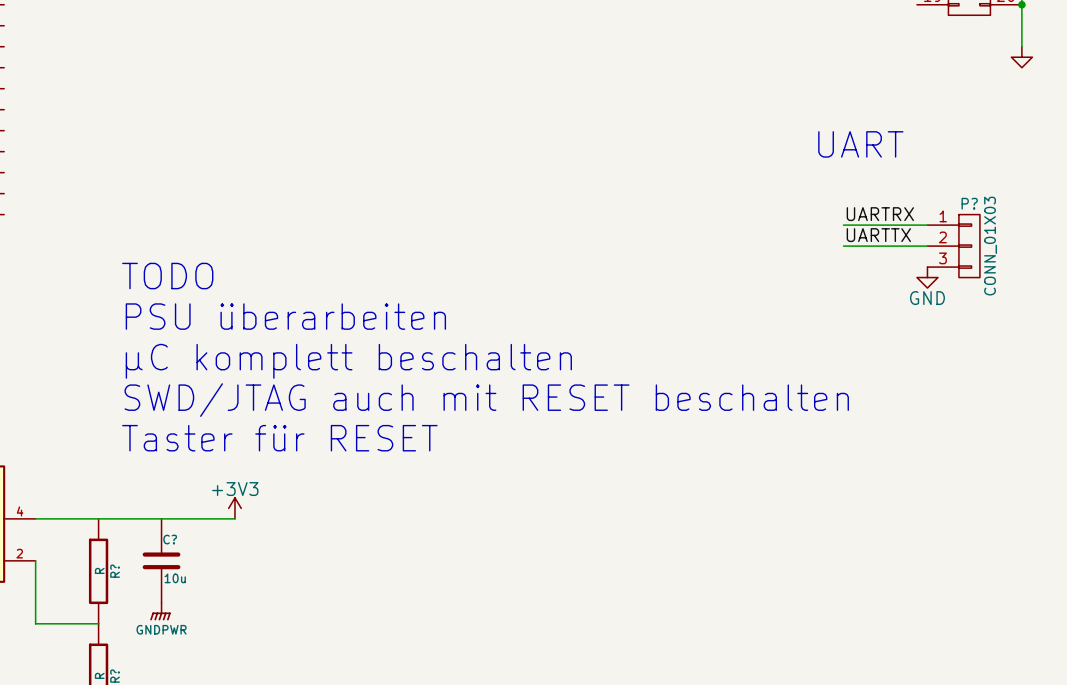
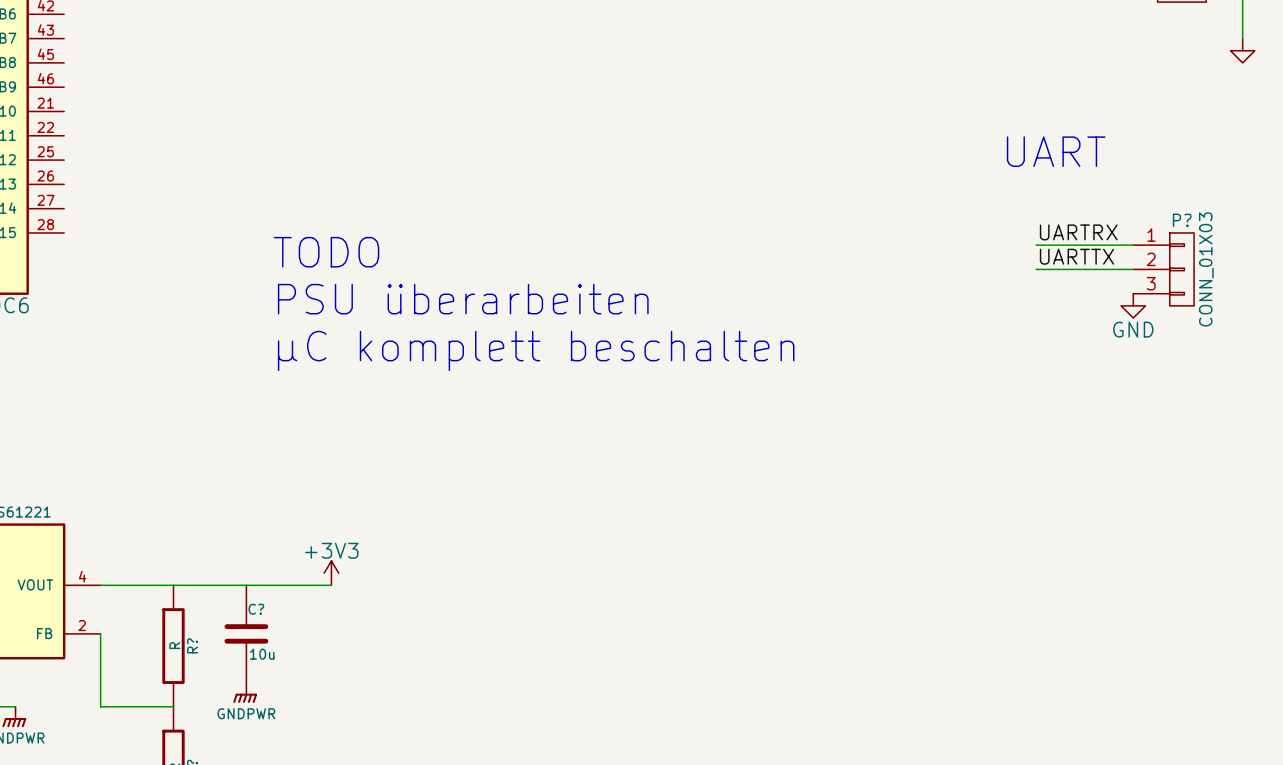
text position: TODO (167, 276) -> TODO (326, 252)
text position: PSU überarbeiten (285, 316) -> PSU überarbeiten (463, 299)
text position: µC komplett beschalten (348, 361) -> µC komplett beschalten (536, 350)
text: SWD/JTAG auch mit RESET beschalten (486, 400) -> none
text: Taster für RESET (279, 438) -> none

